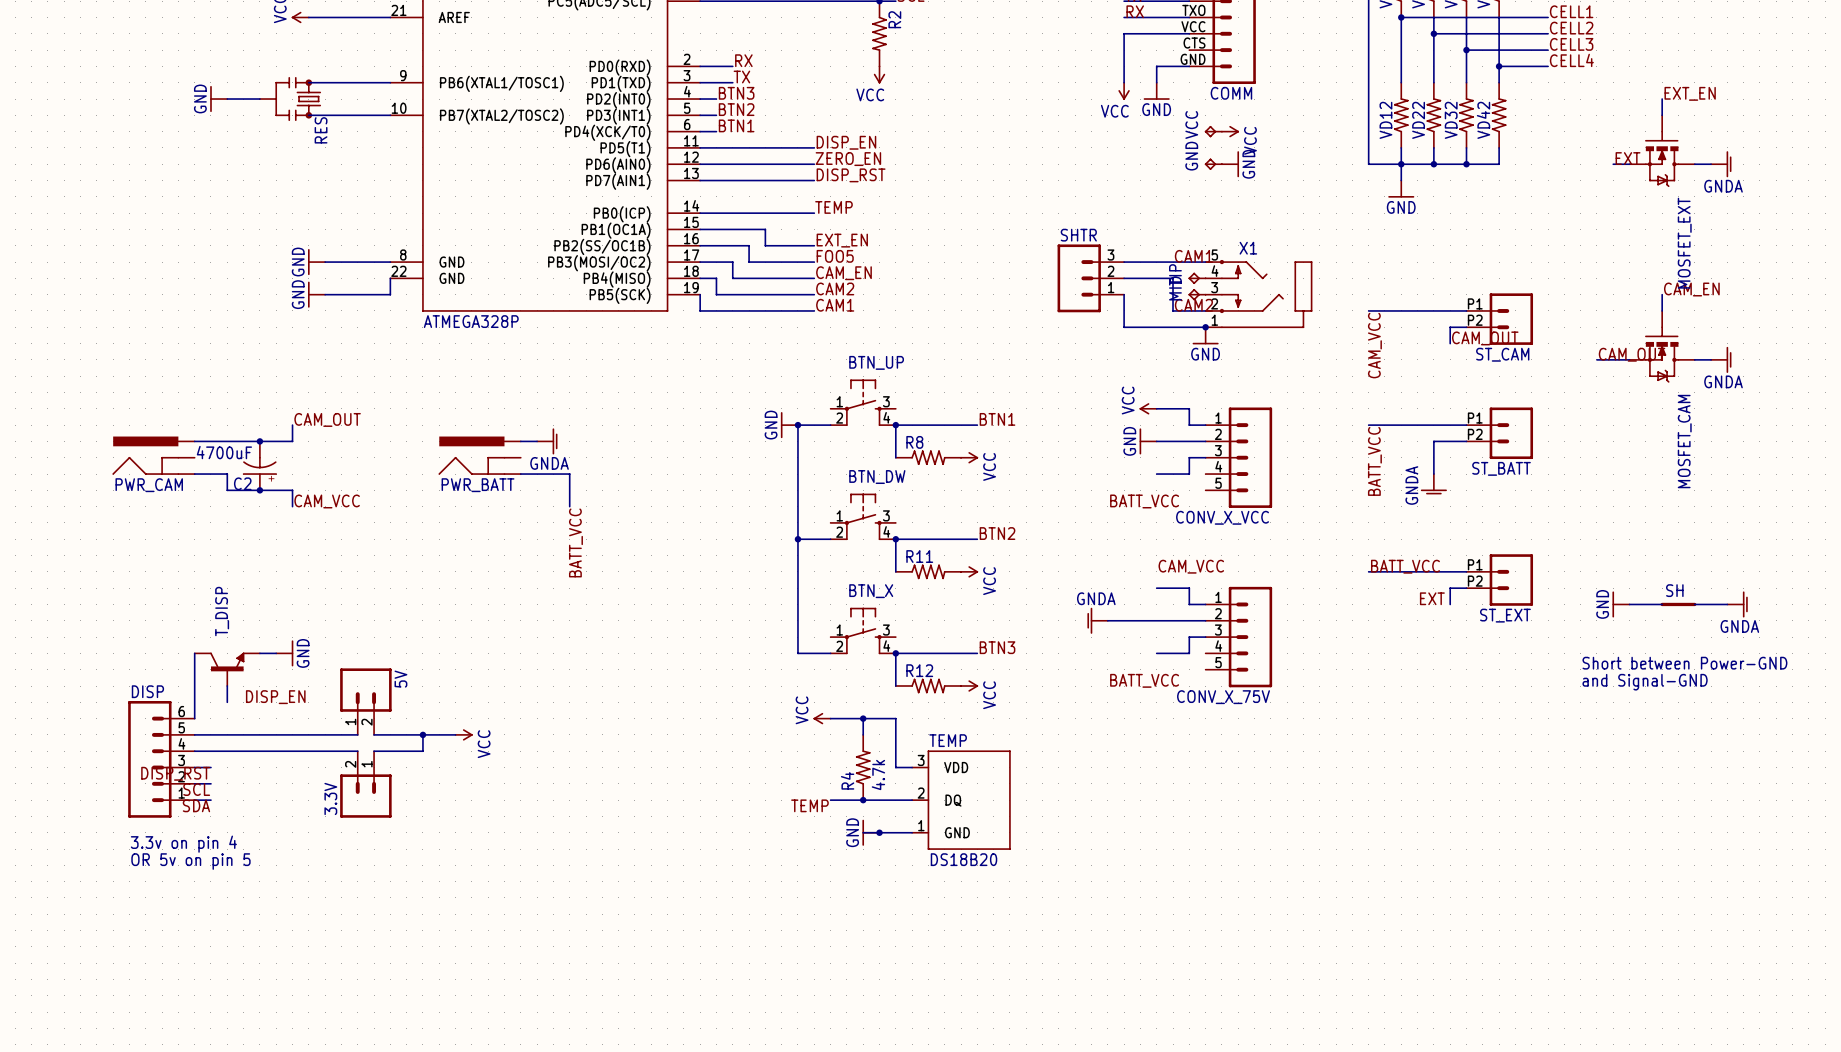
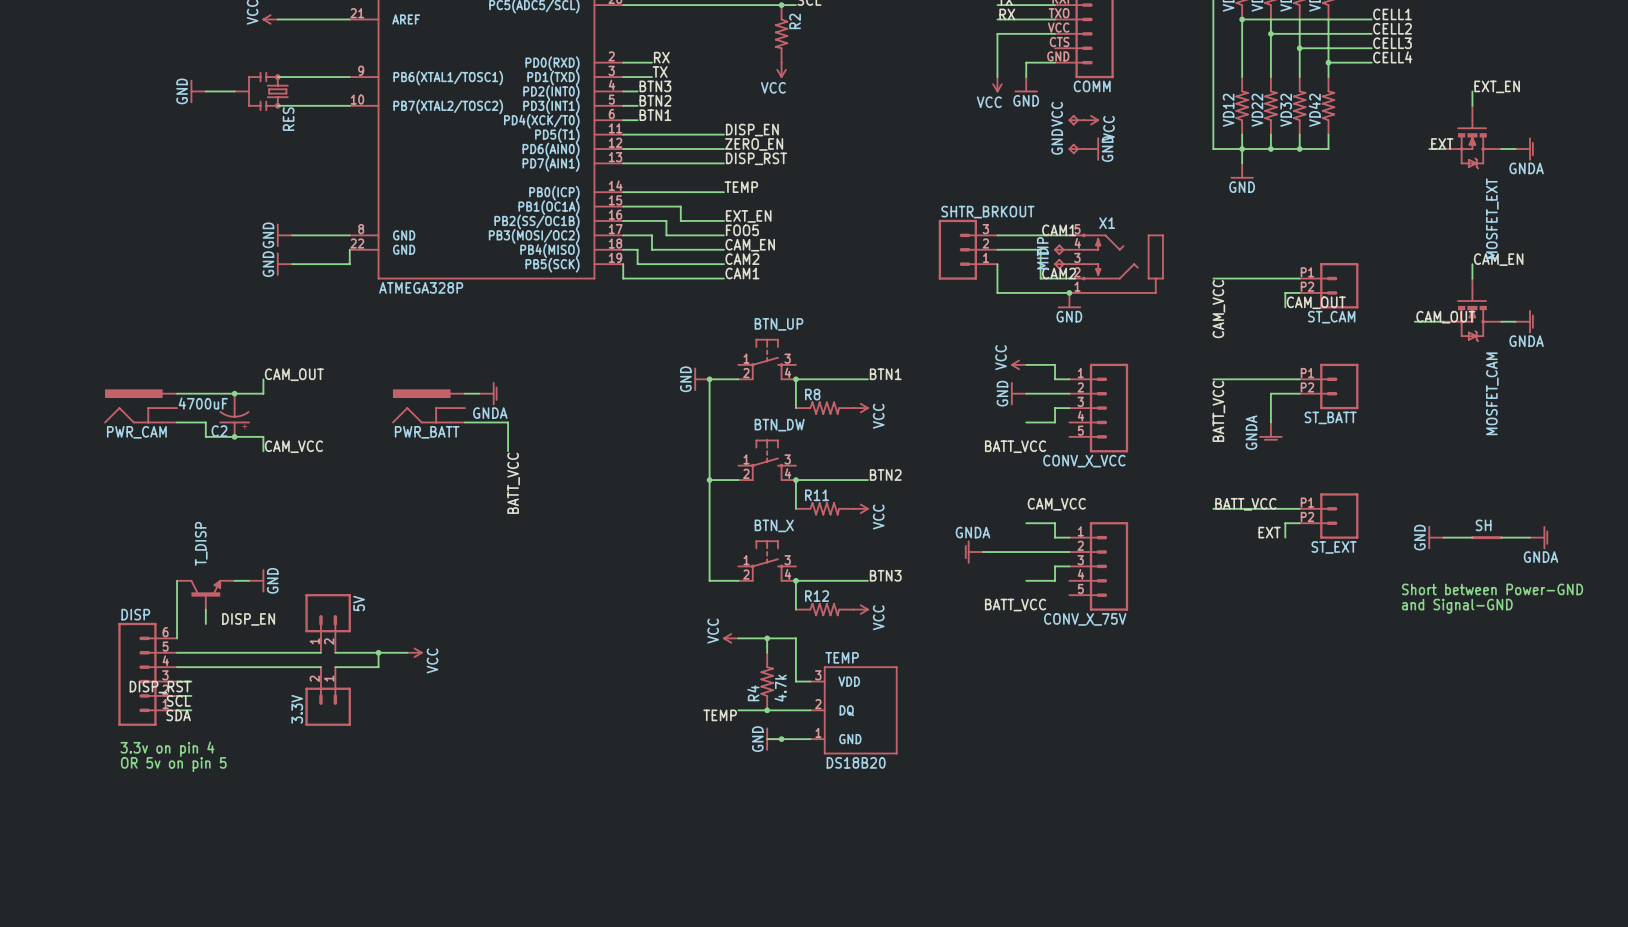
SHTR name: SHTR (1078, 235) -> SHTR_BRKOUT (987, 212)

